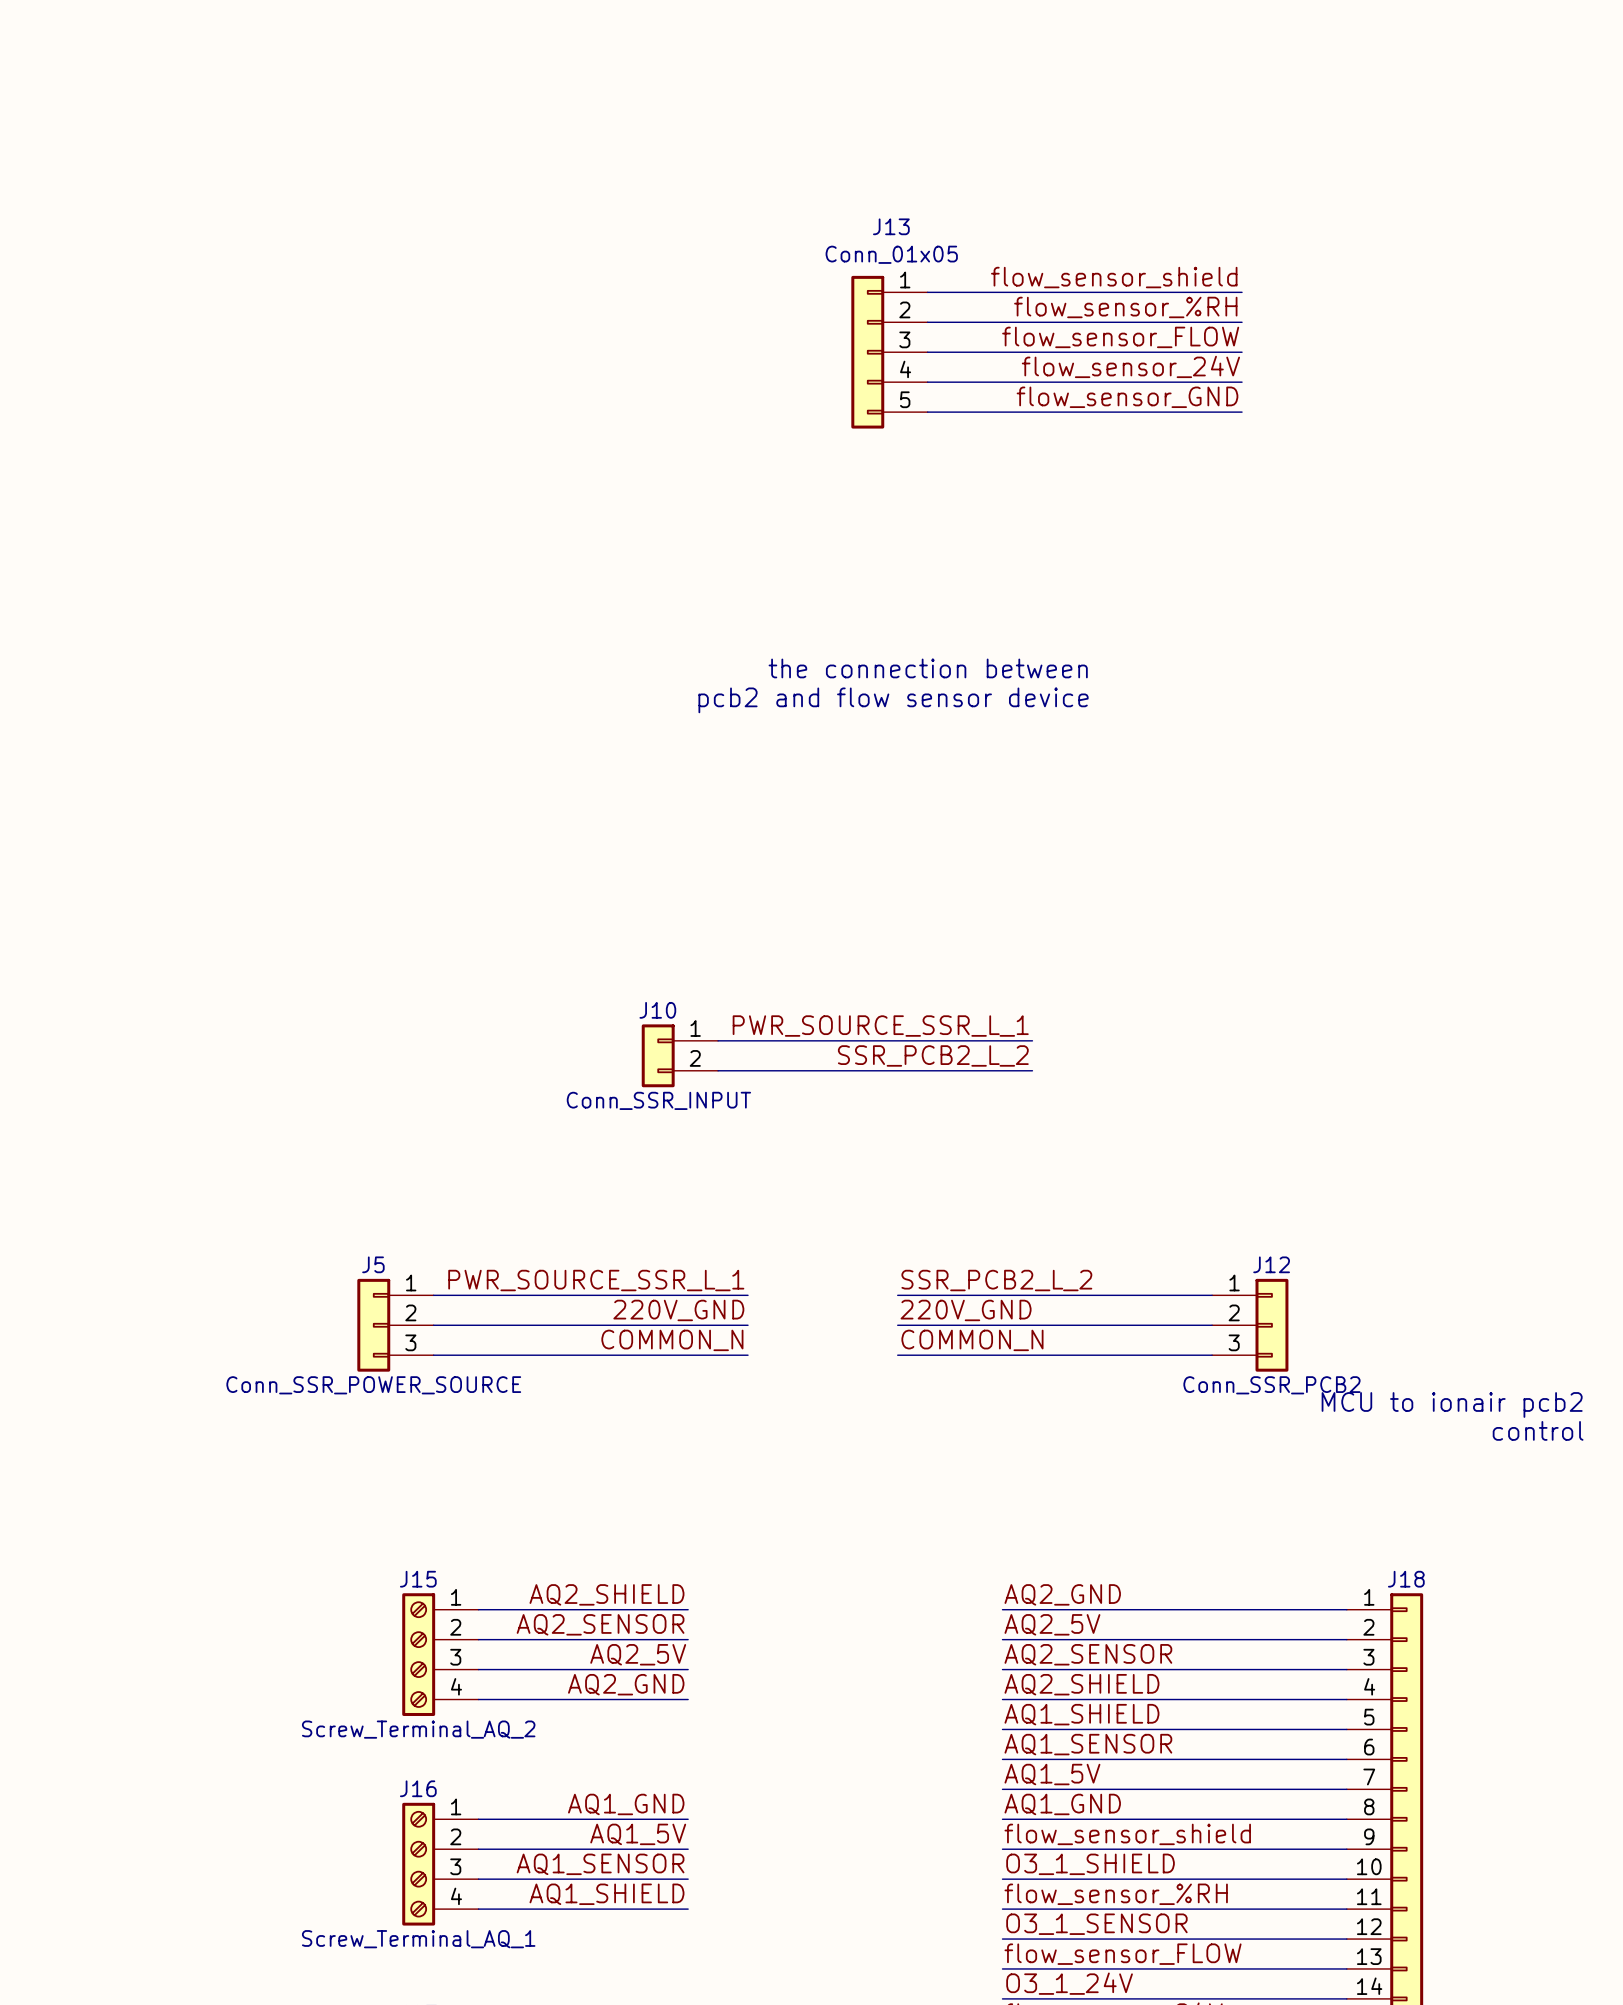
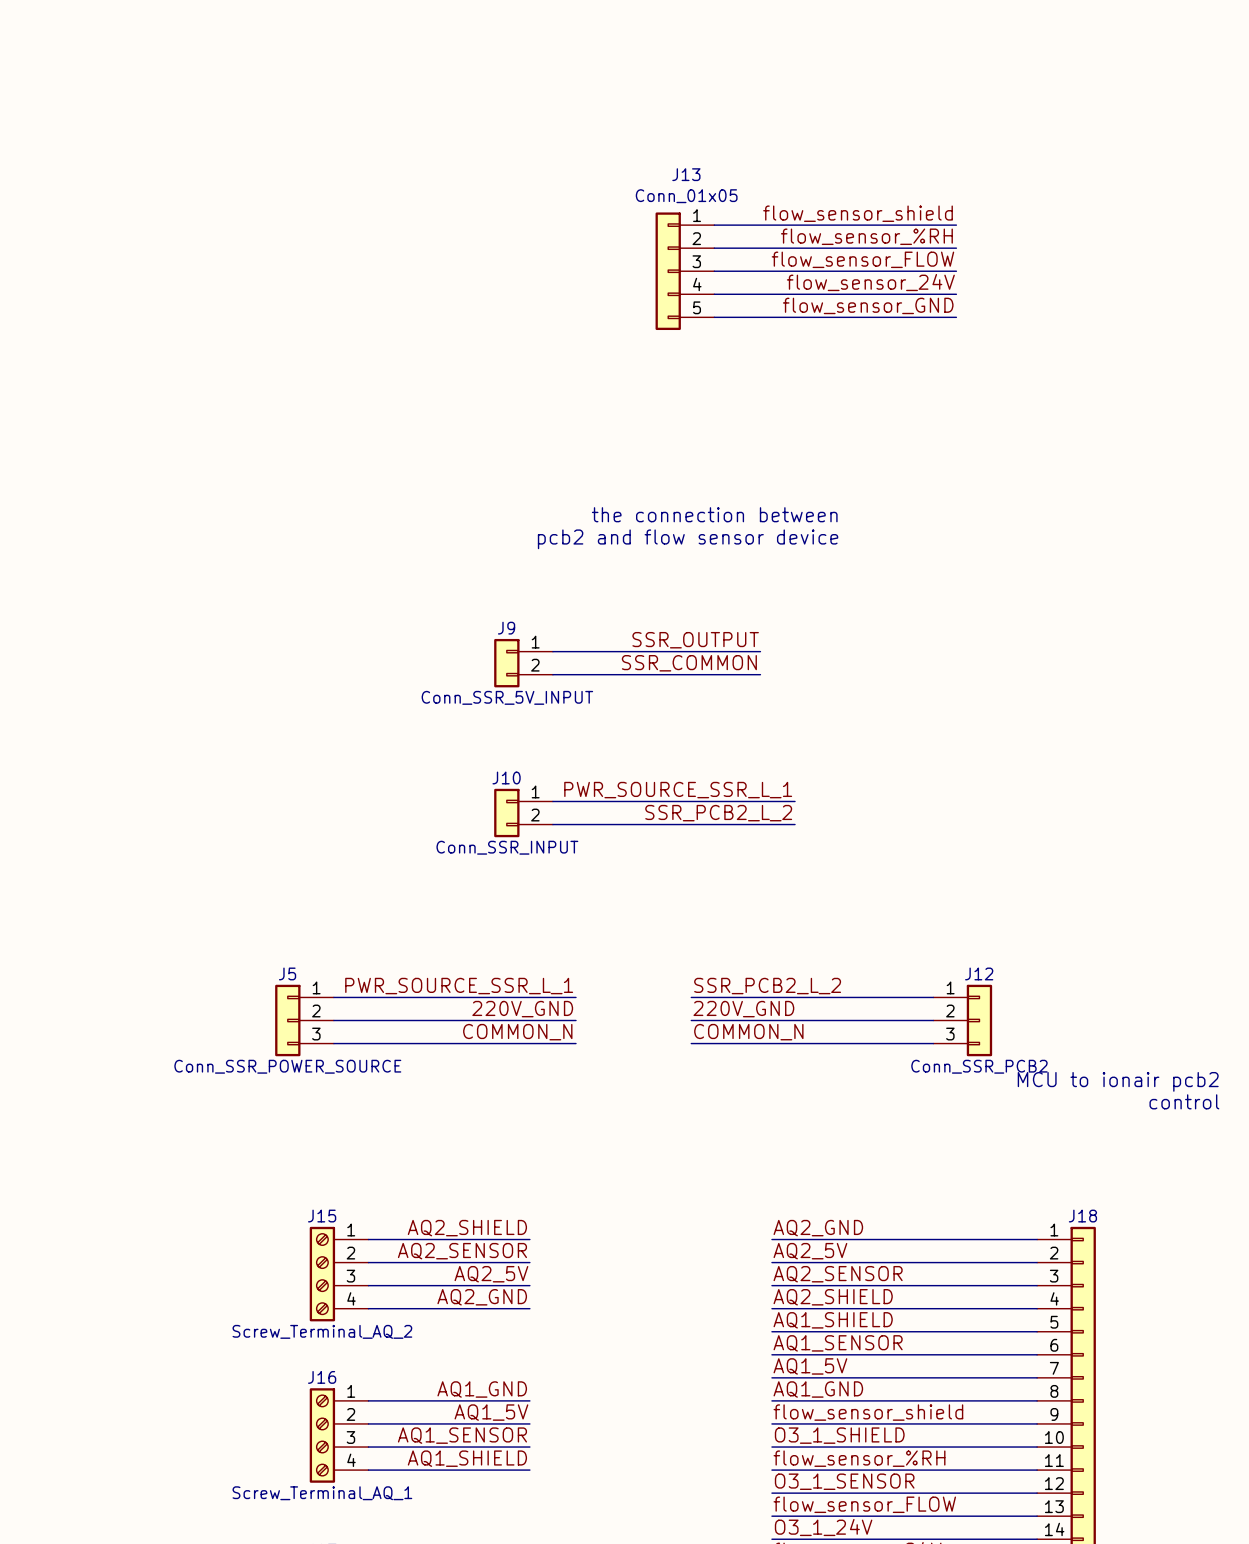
label: none -> SSR_OUTPUT (695, 640)
wire: none -> (552, 651) (760, 651)
J9: none -> Conn_SSR_5V_INPUT (523, 663)
label: none -> SSR_COMMON (689, 663)
wire: none -> (552, 674) (760, 674)

